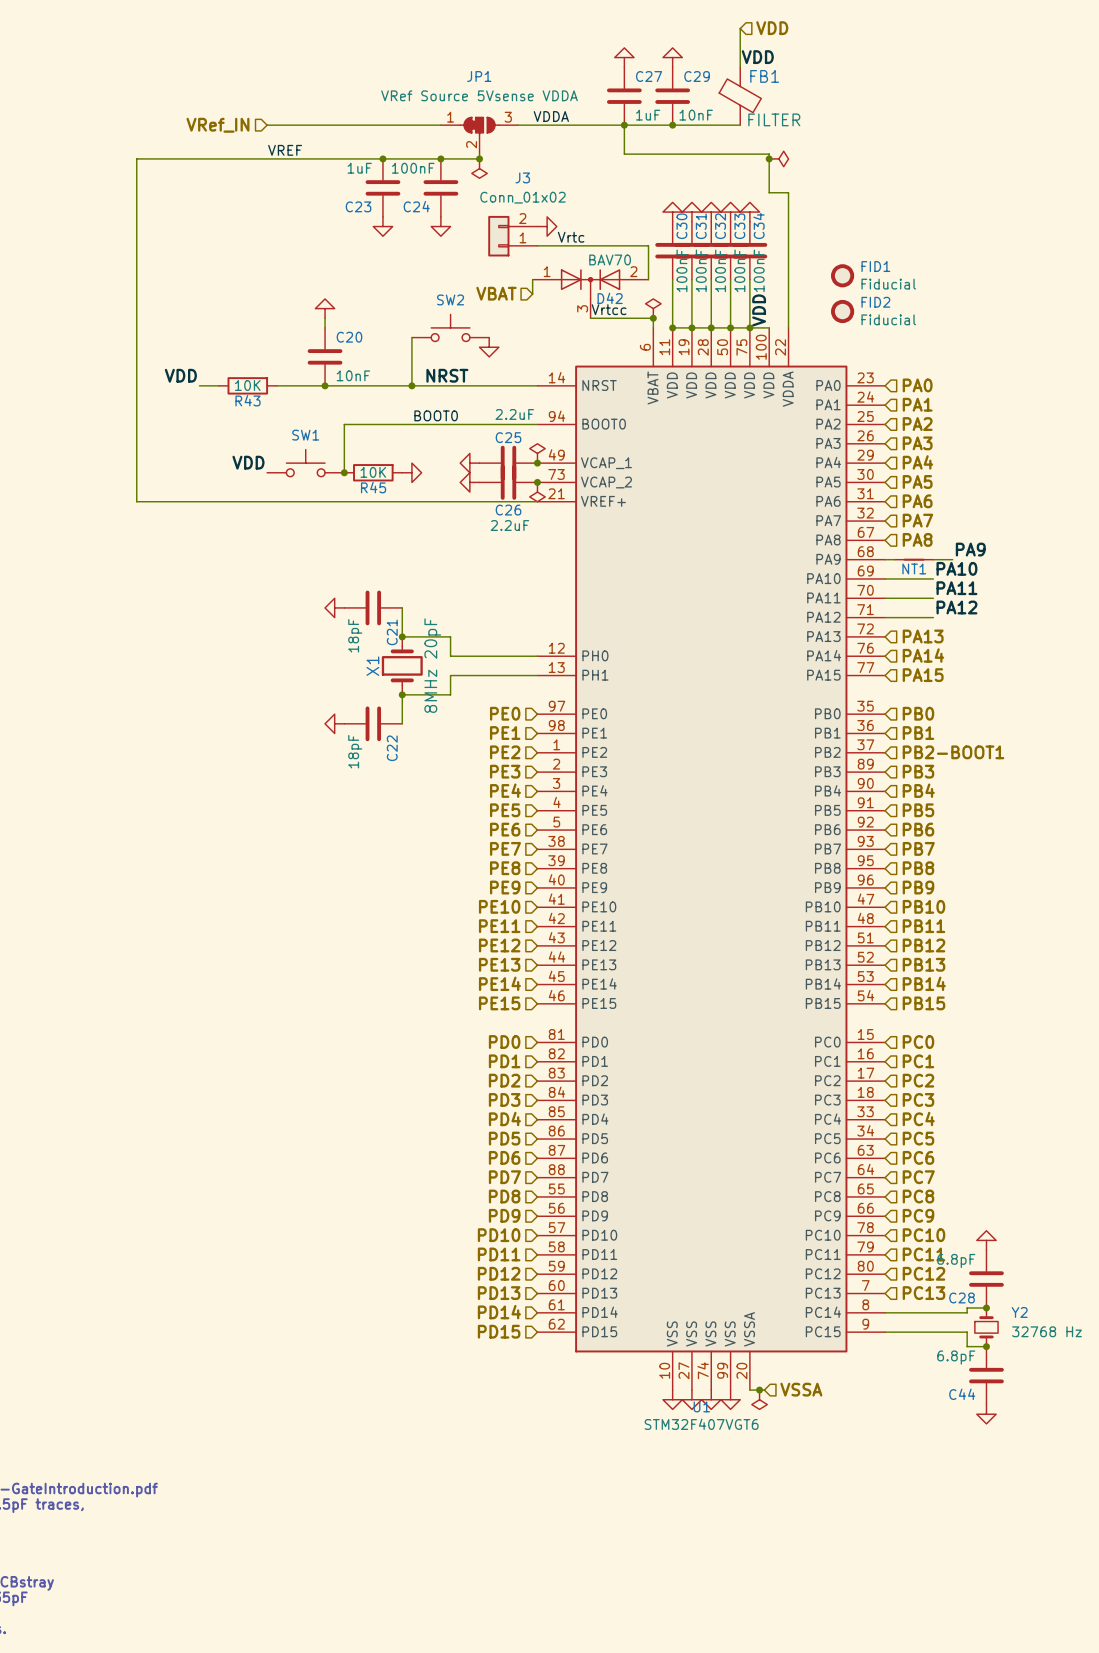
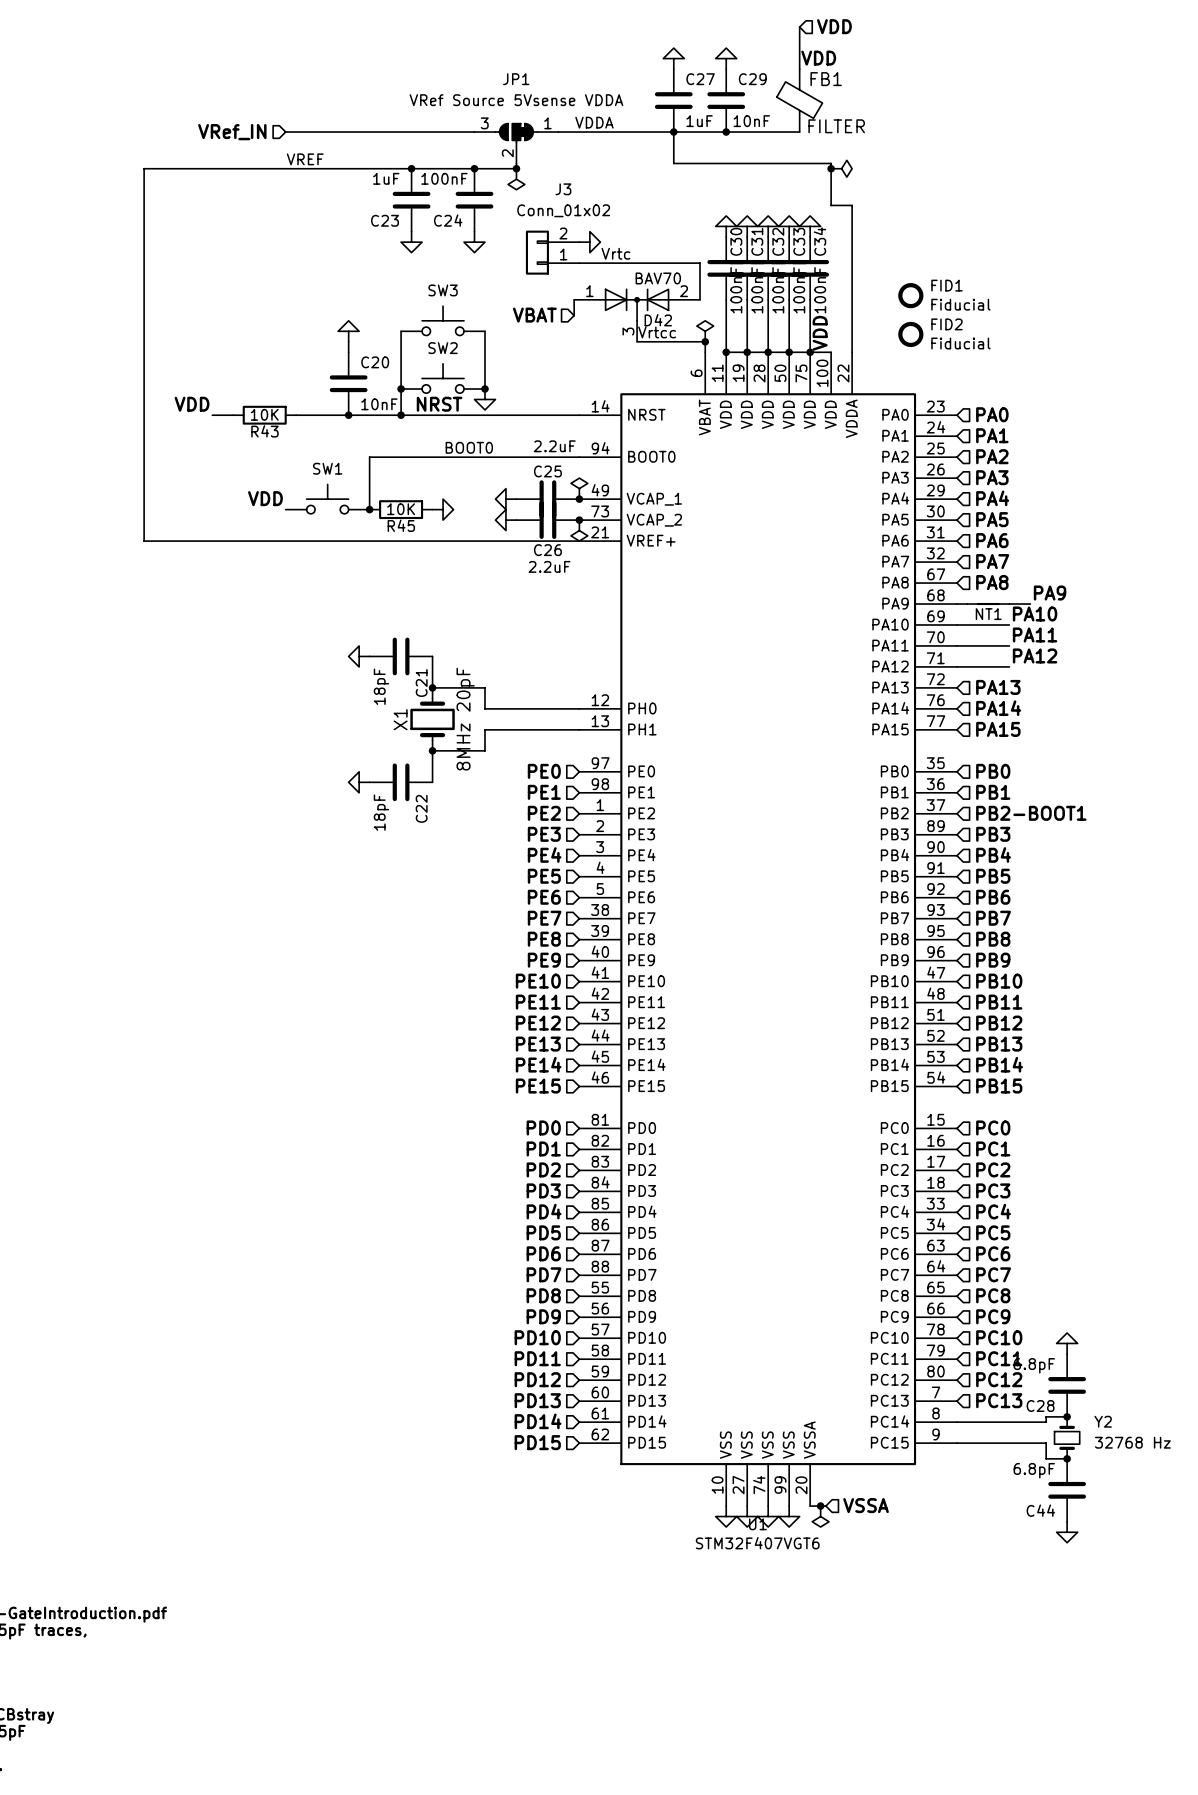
JP1 flip: as is (479, 126) -> left-right (516, 133)
SW3: none -> (443, 320)
wire: none -> (401, 331) (401, 415)
wire: none -> (484, 331) (484, 388)
SW2 position: (450, 327) -> (443, 378)
wire: (411, 337) (411, 385) -> none
power symbol position: (489, 347) -> (484, 399)
junction: none -> (401, 388)
junction: none -> (484, 388)
label position: NRST (447, 375) -> NRST (439, 404)
junction: none -> (401, 415)
junction: (411, 385) -> none

